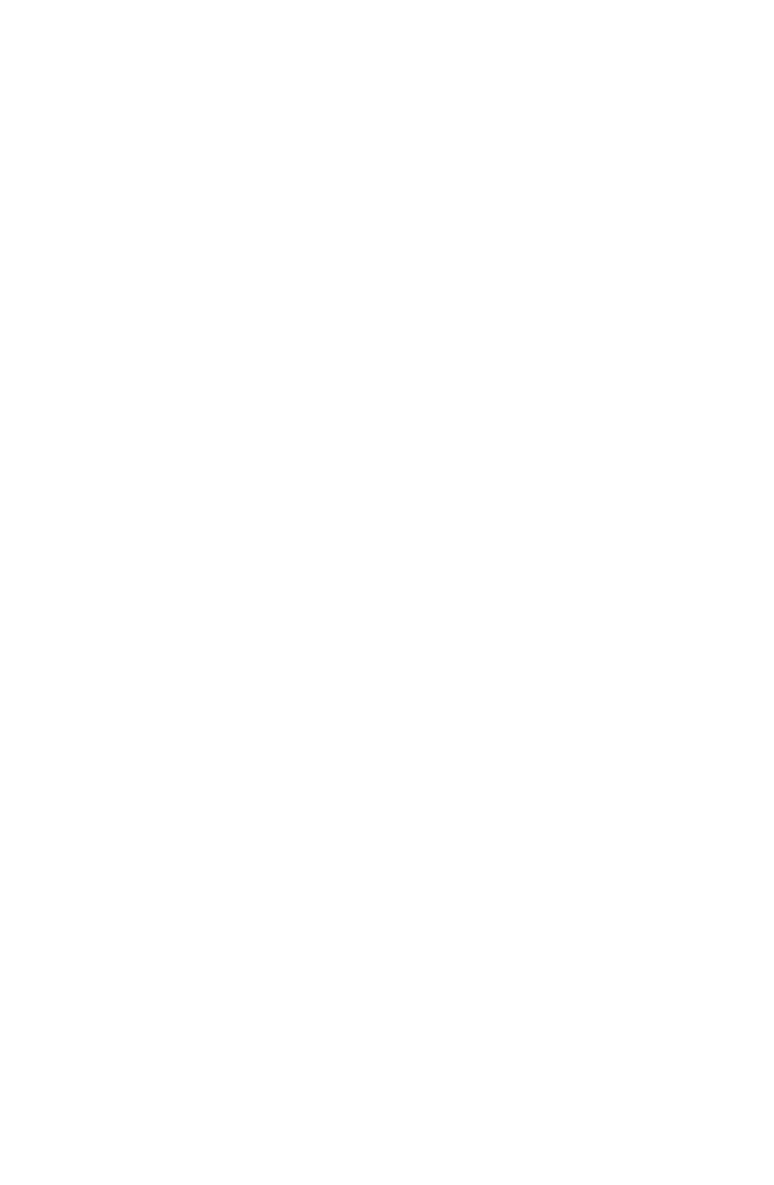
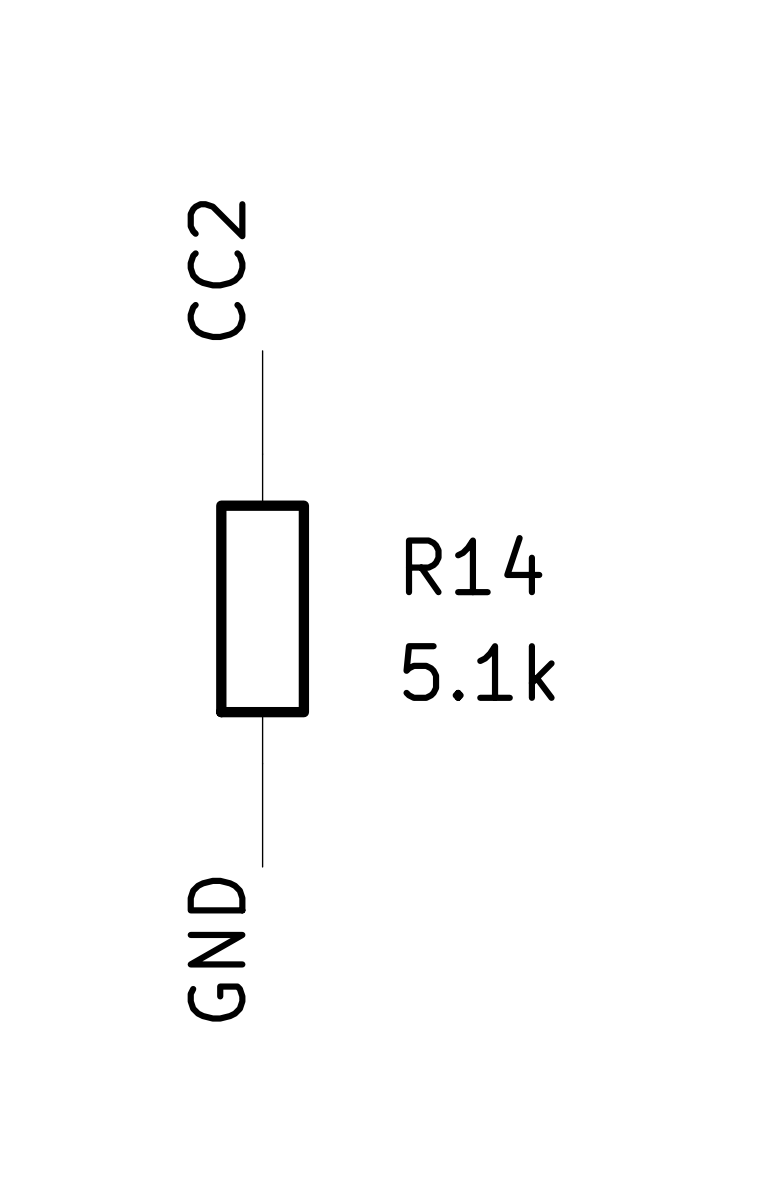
label: none -> CC2 (216, 270)
wire: none -> (262, 350) (262, 454)
R14: none -> 5.1k (262, 608)
wire: none -> (262, 763) (262, 866)
label: none -> GND (216, 949)

